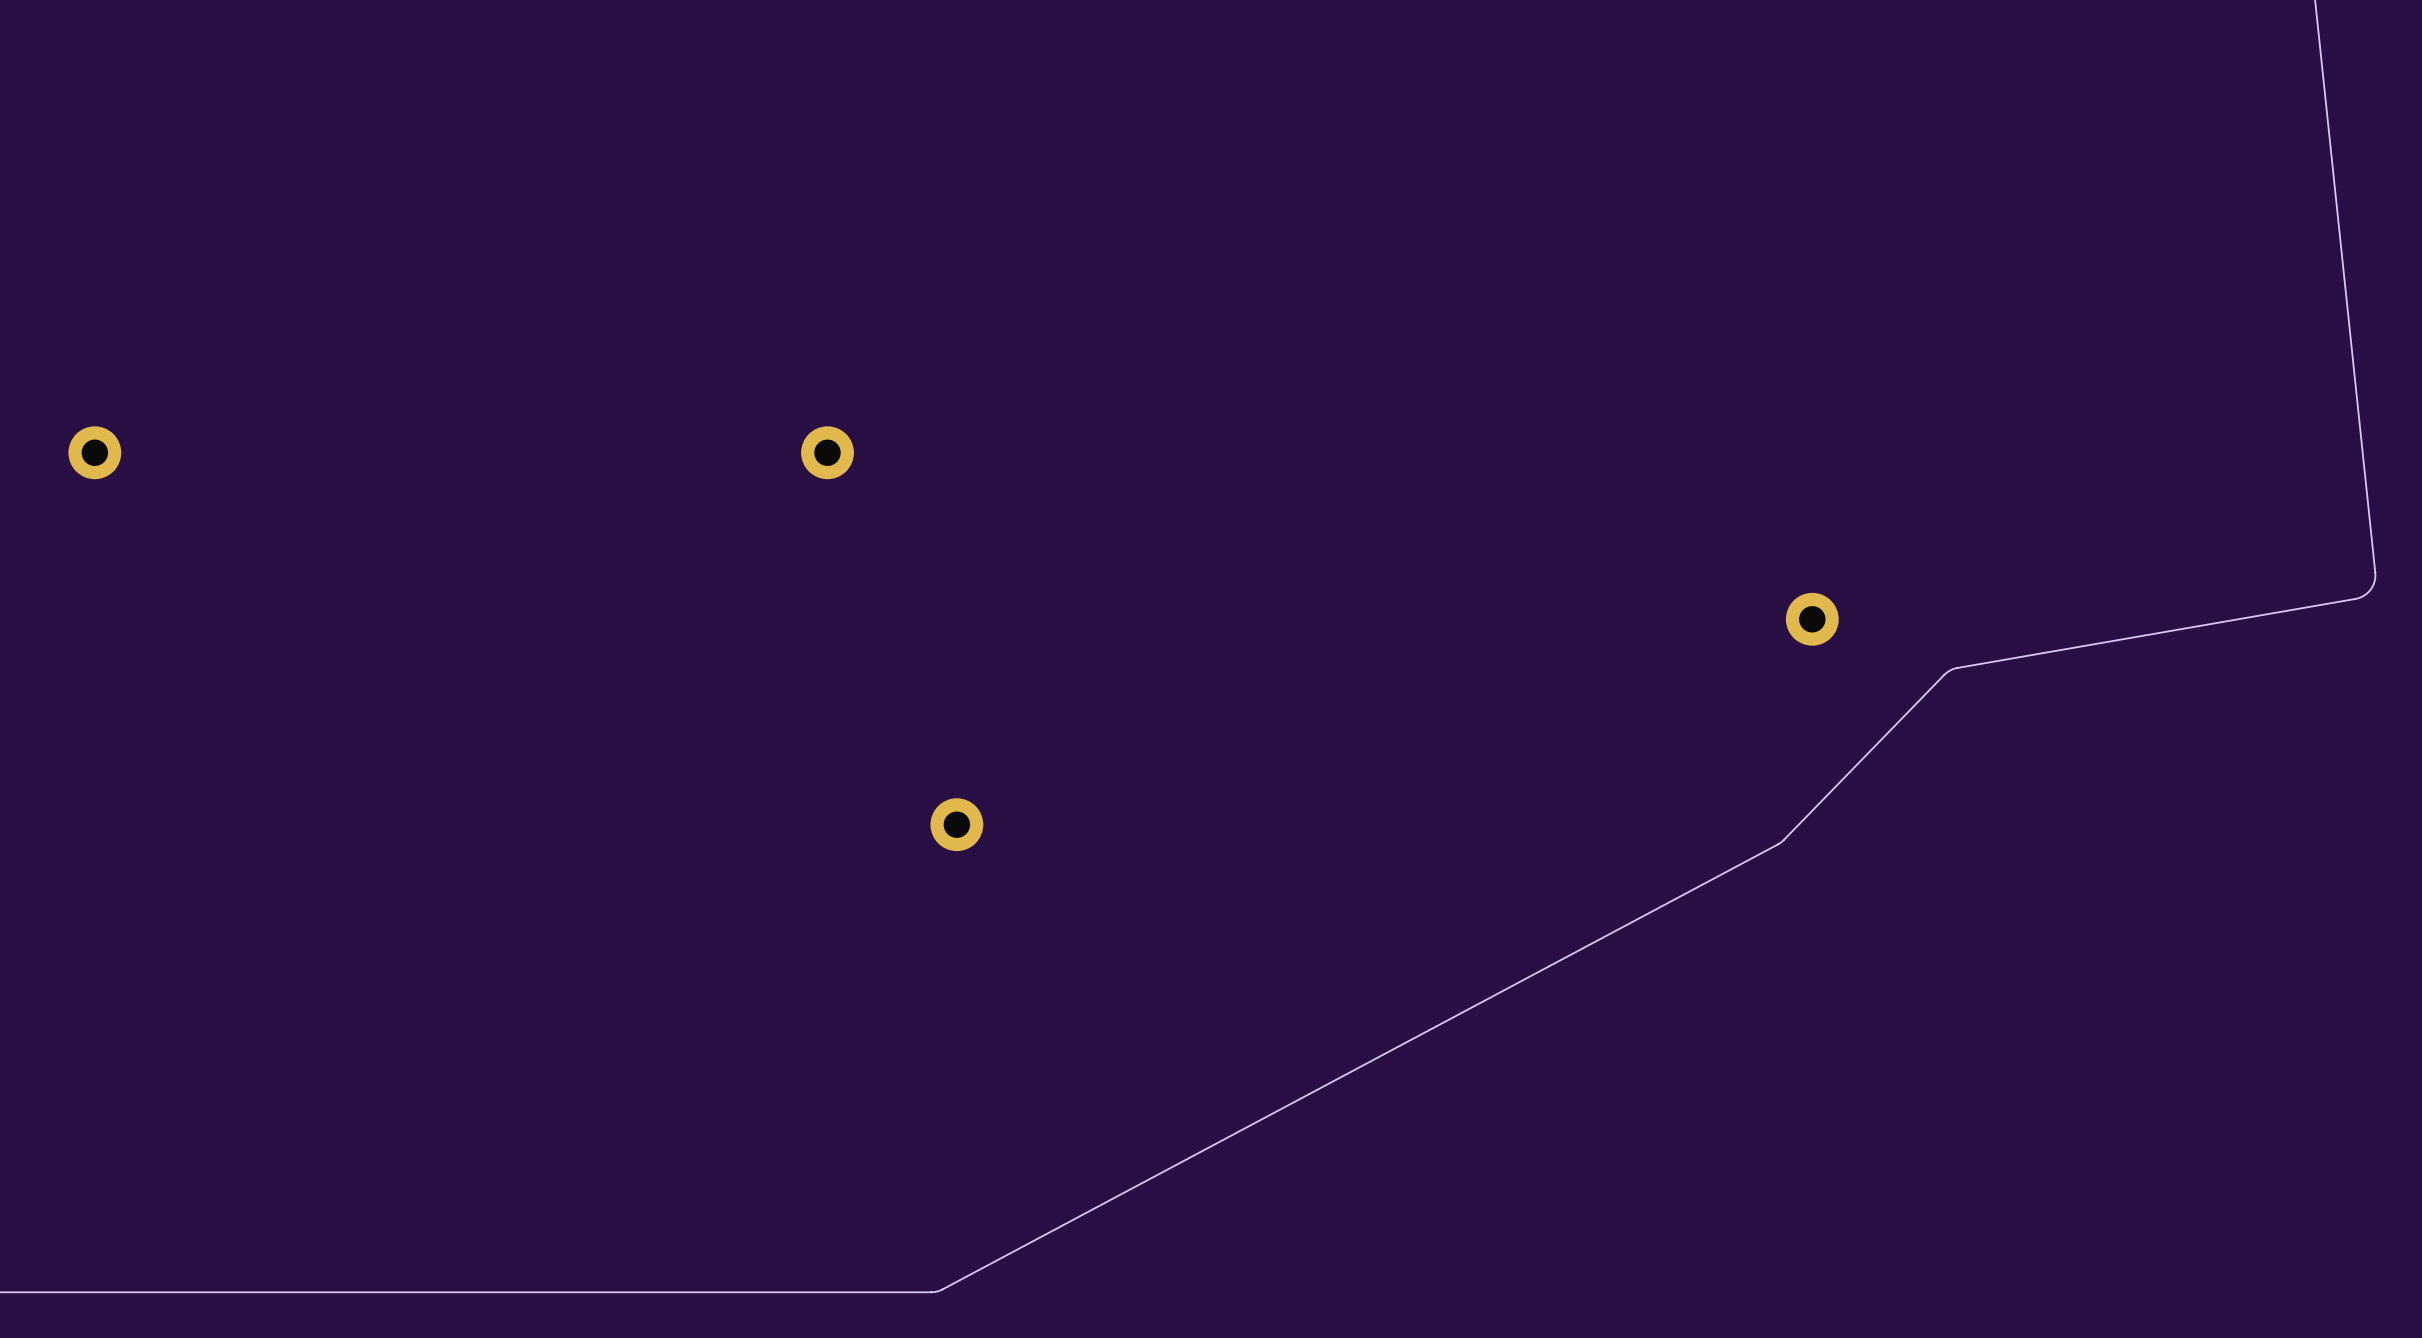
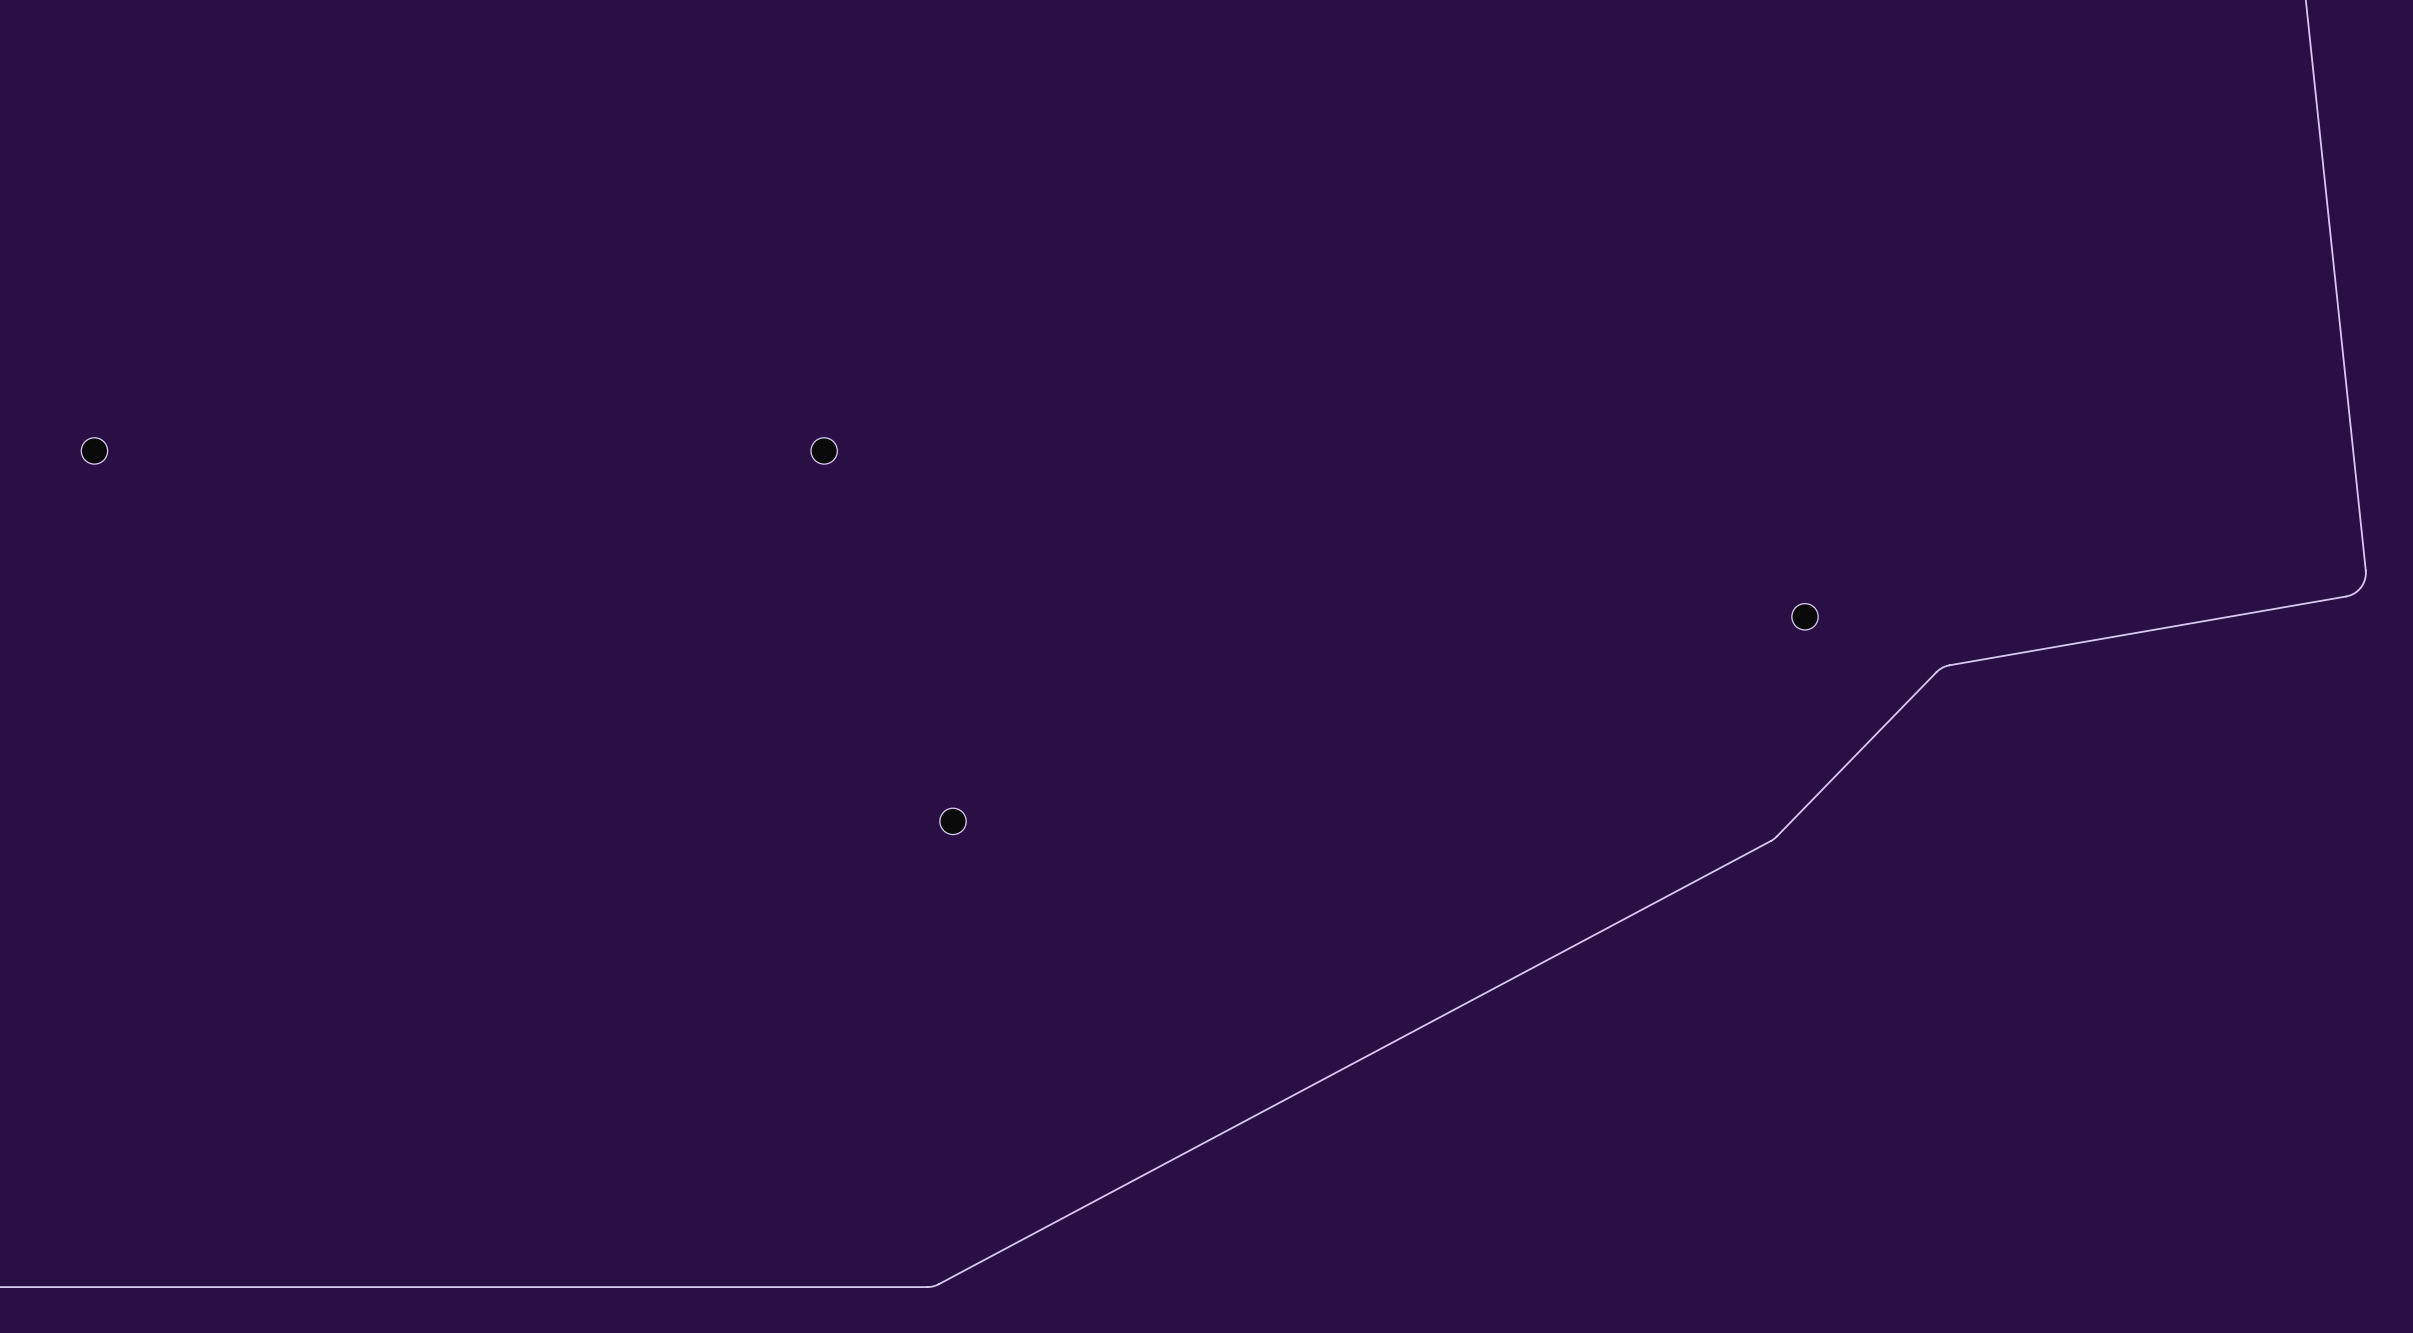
part footprint: [68, 426, 122, 480] -> [81, 437, 108, 465]
part footprint: [801, 426, 854, 480] -> [811, 437, 838, 465]
part footprint: [1785, 592, 1839, 646] -> [1791, 603, 1819, 630]
part footprint: [930, 798, 984, 852] -> [939, 808, 967, 835]

